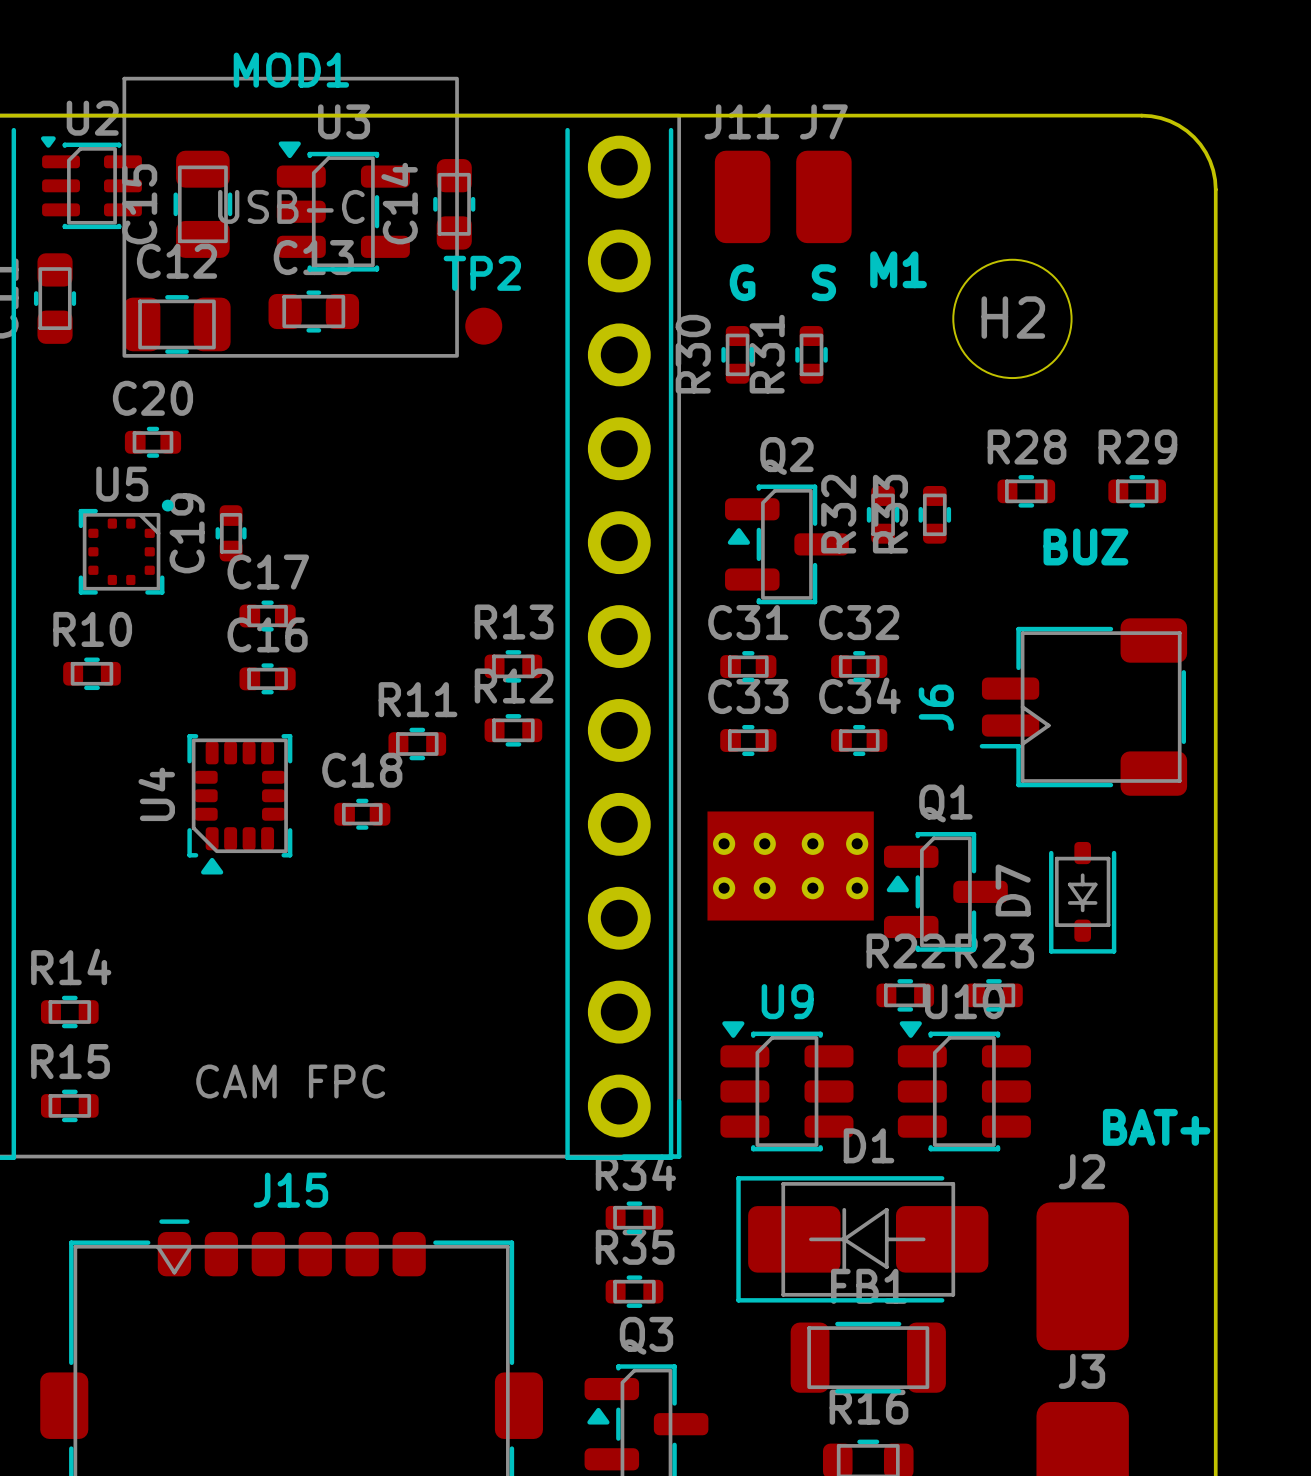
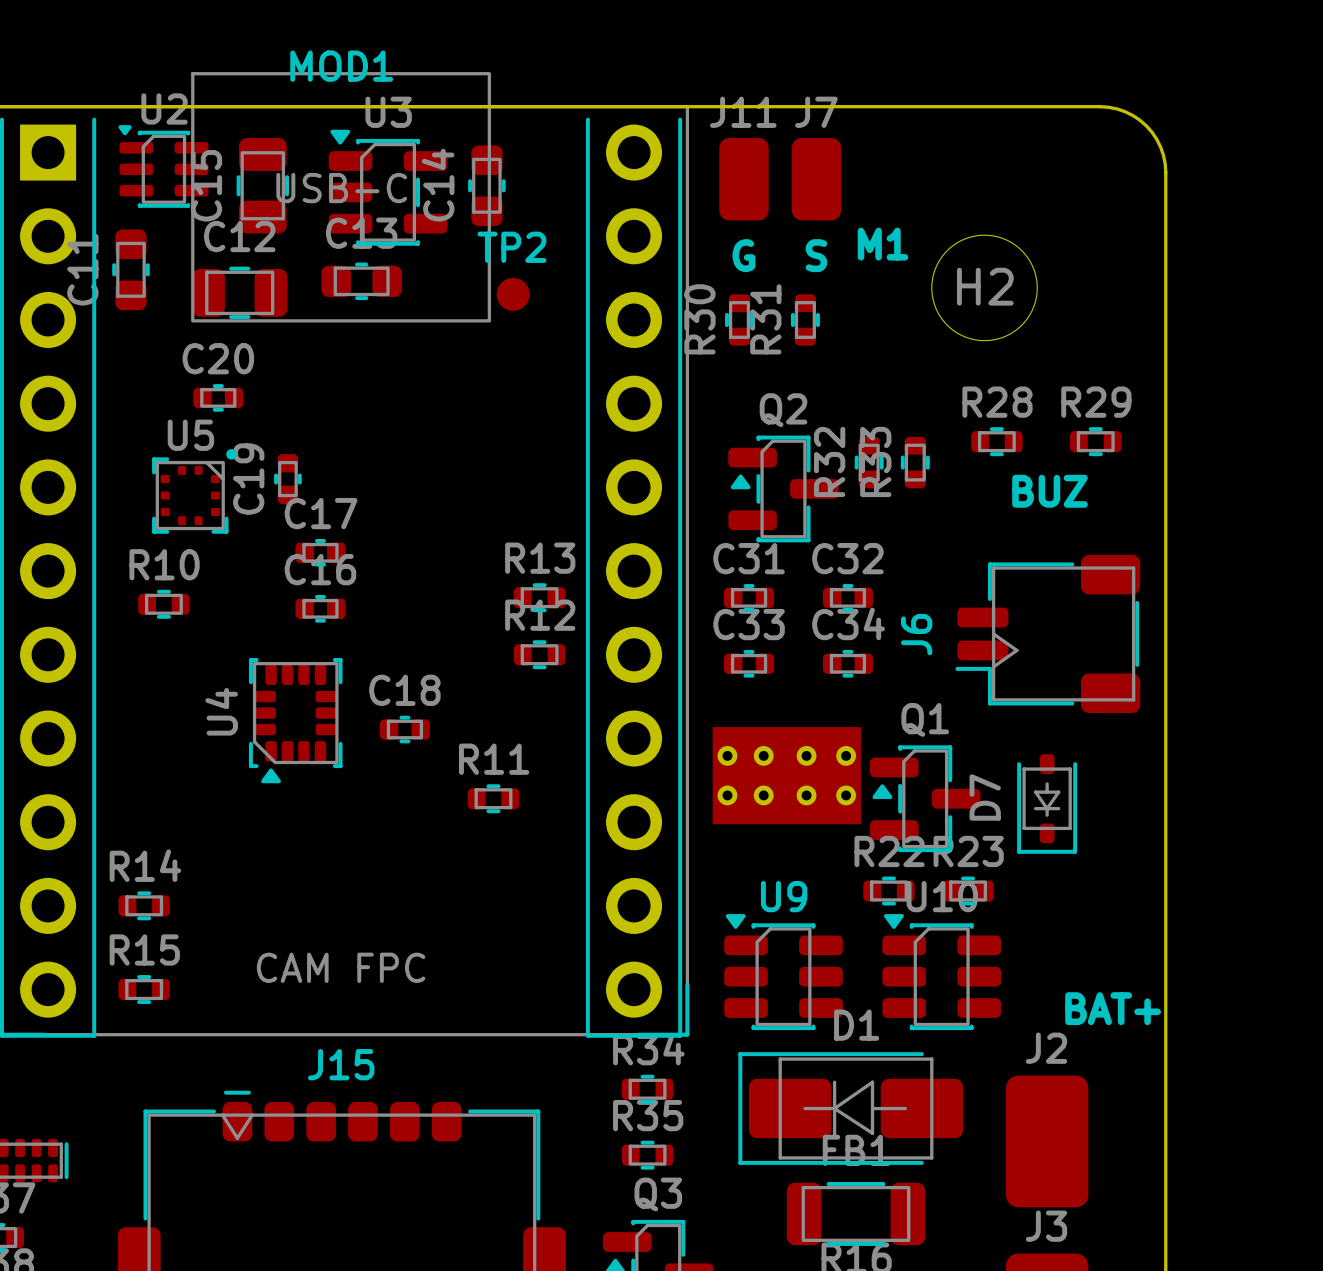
R11 position: (417, 744) -> (493, 798)

